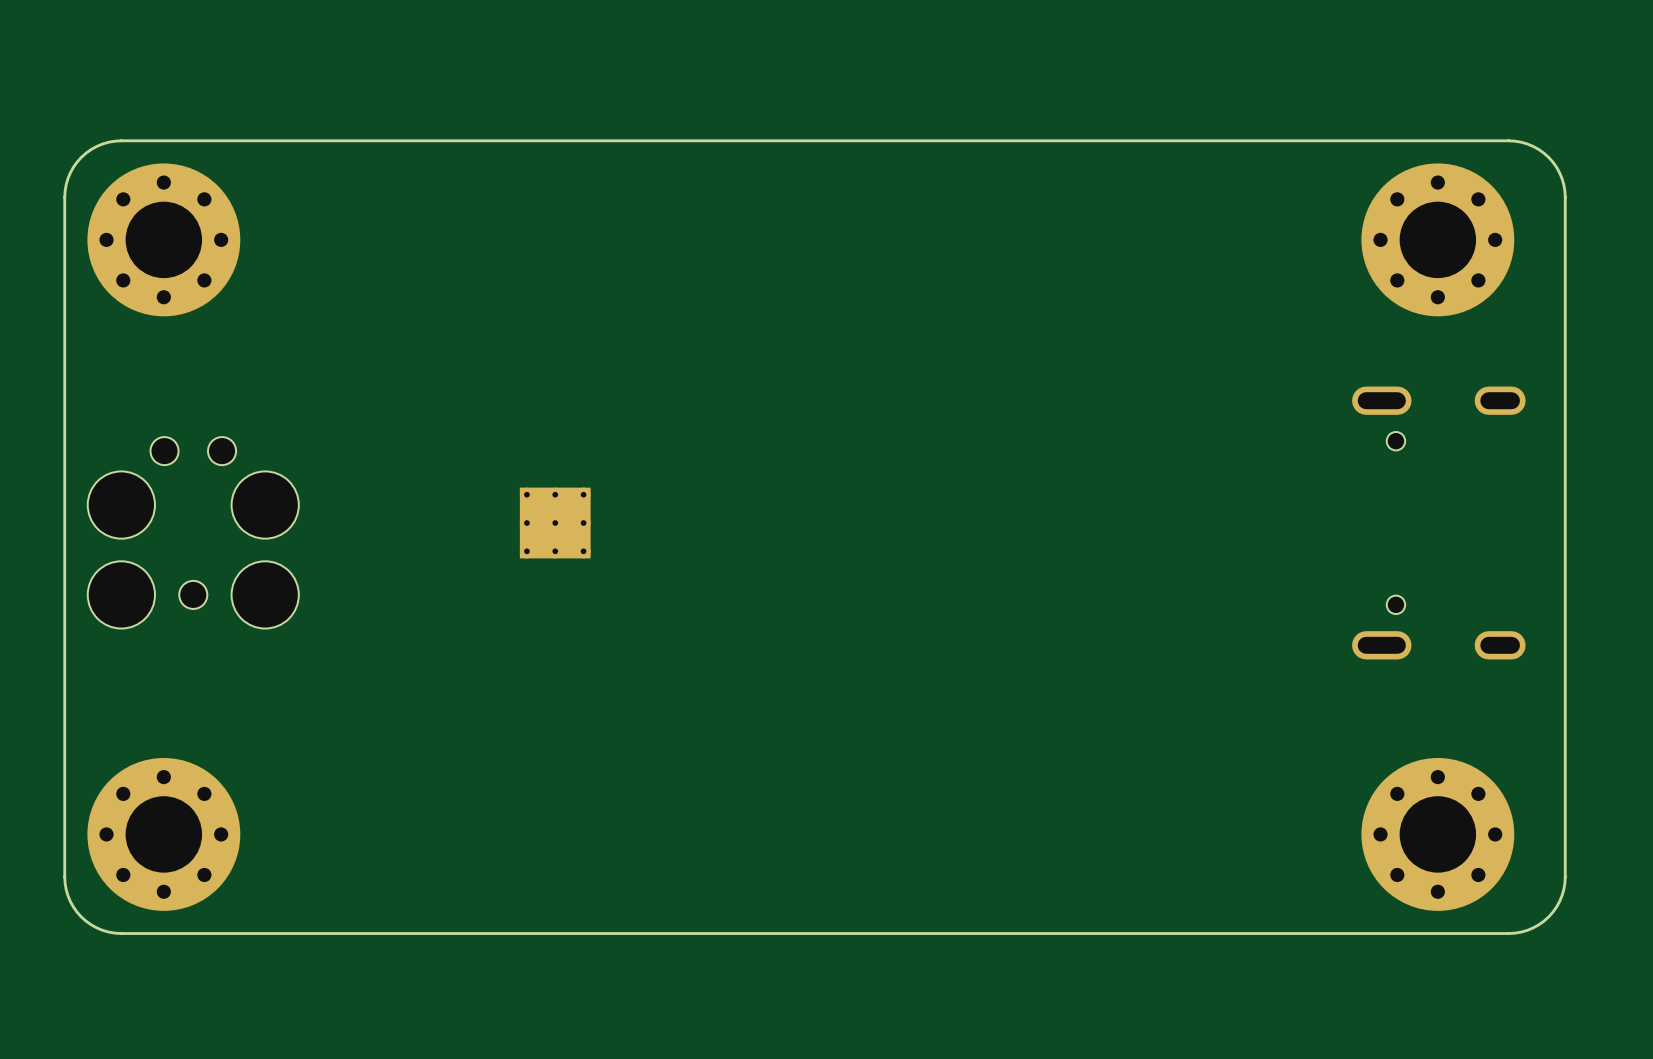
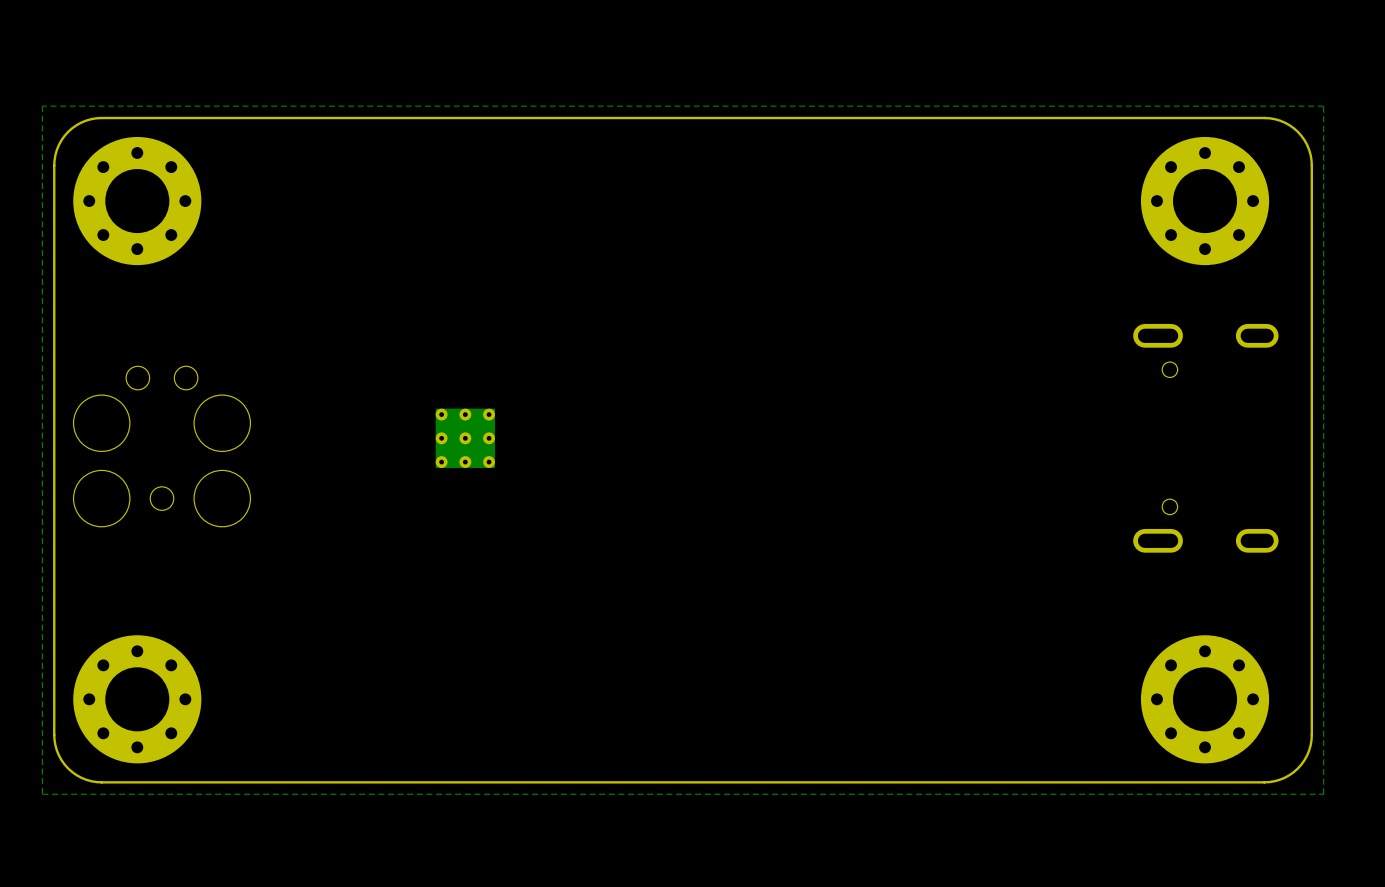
zone outline: none -> (1323, 106) (42, 106) (42, 794) (1323, 794) (1323, 106)

